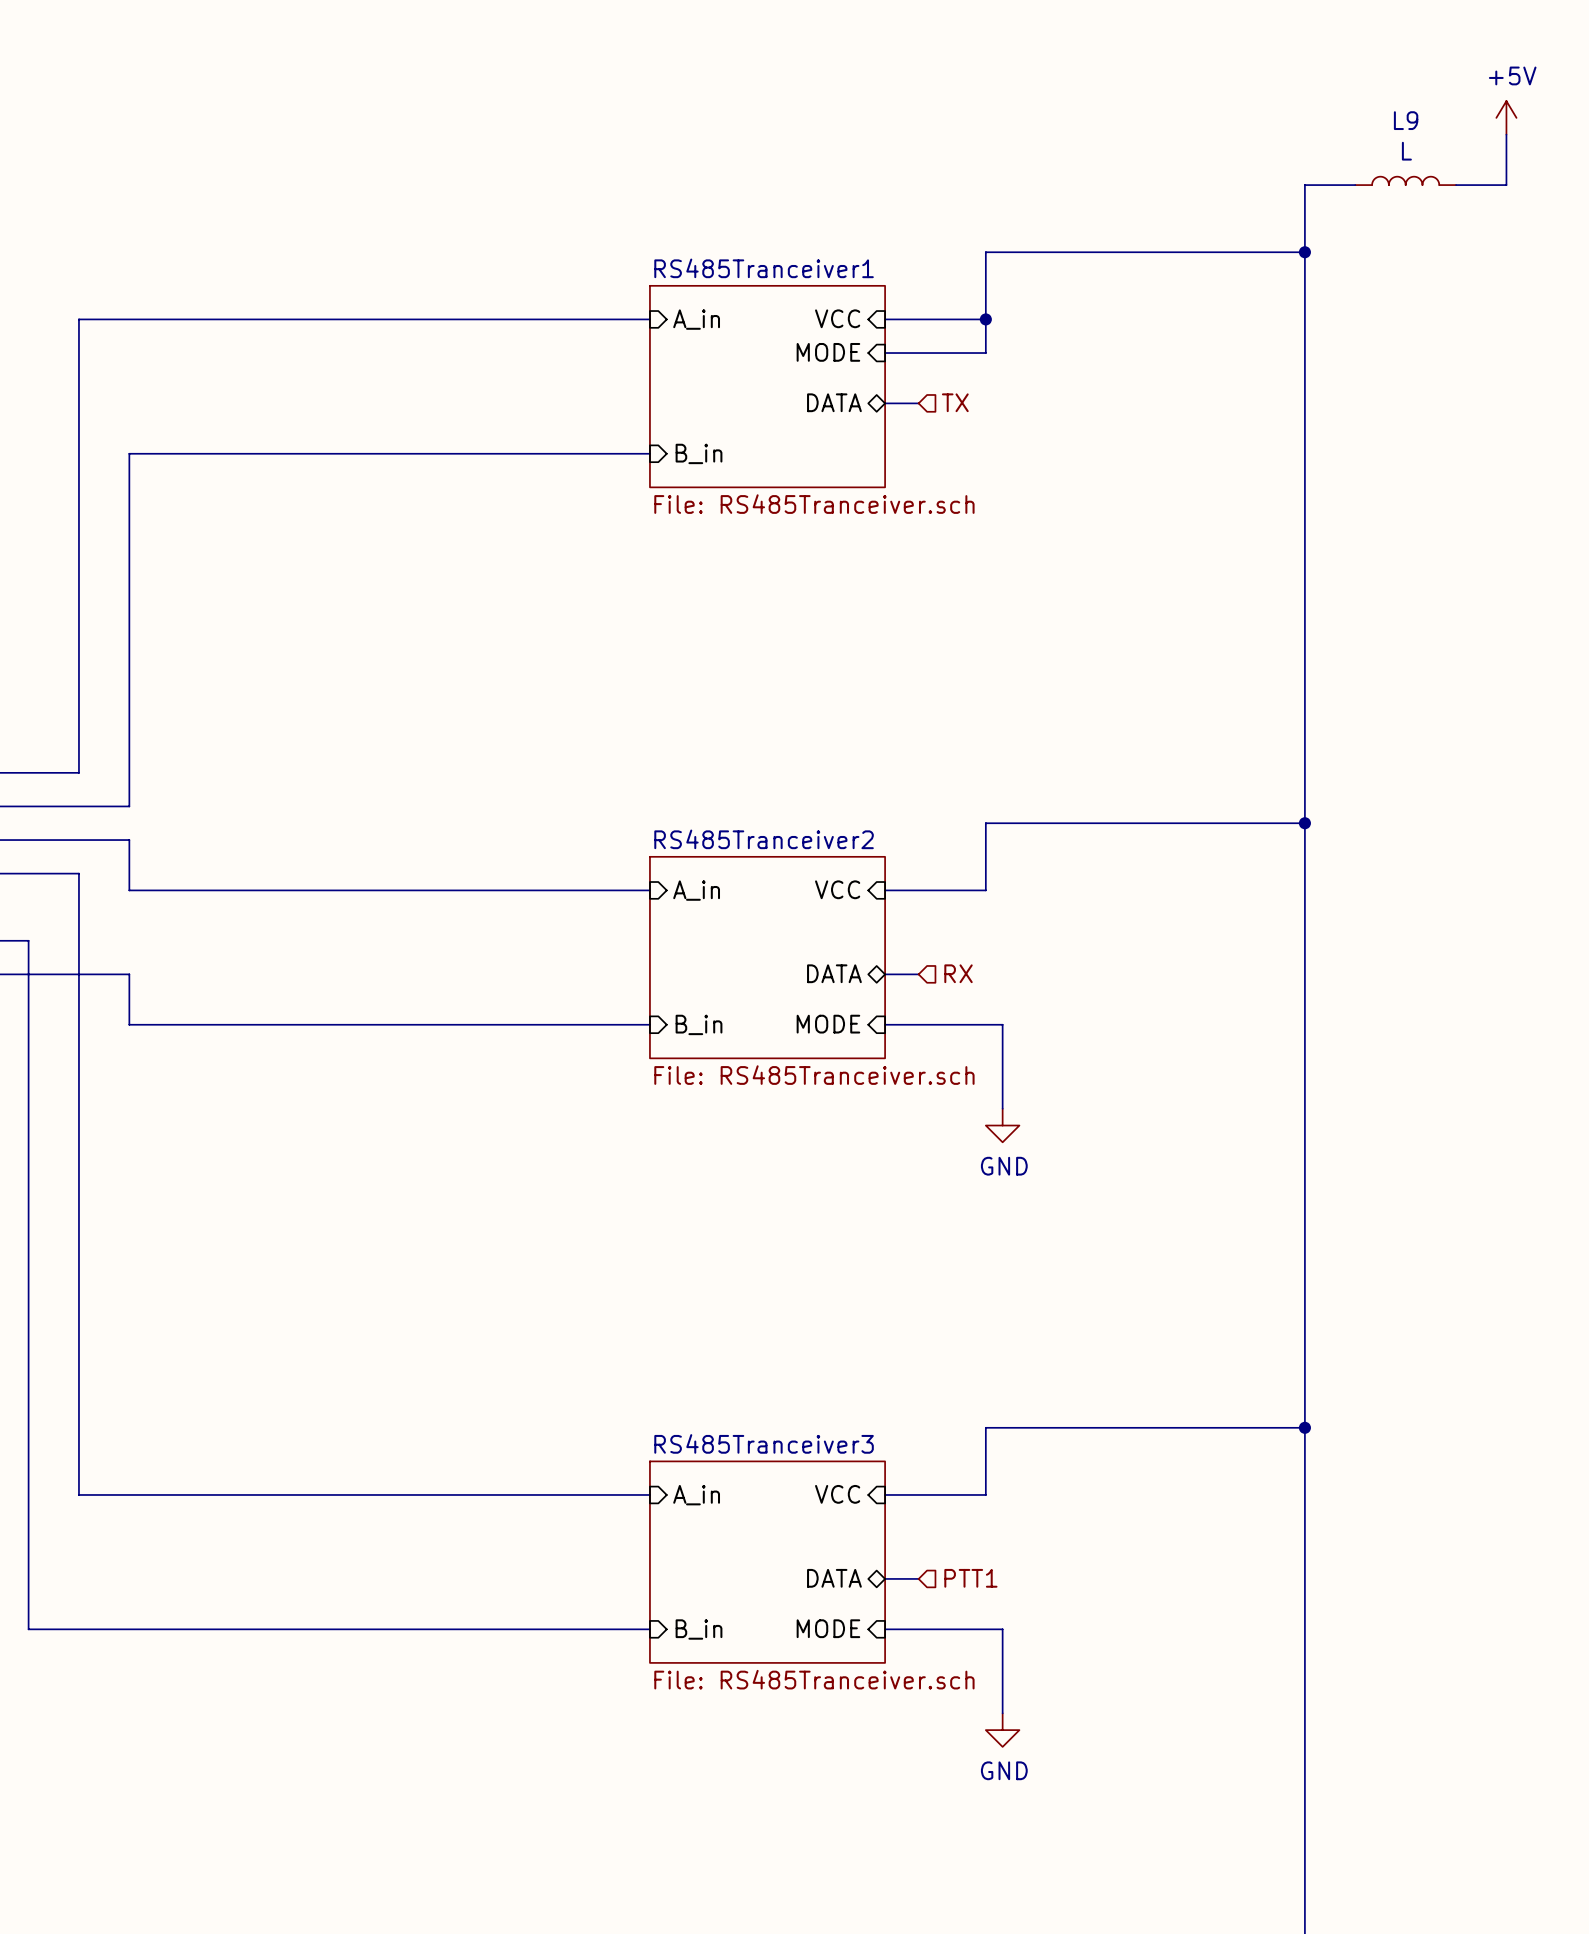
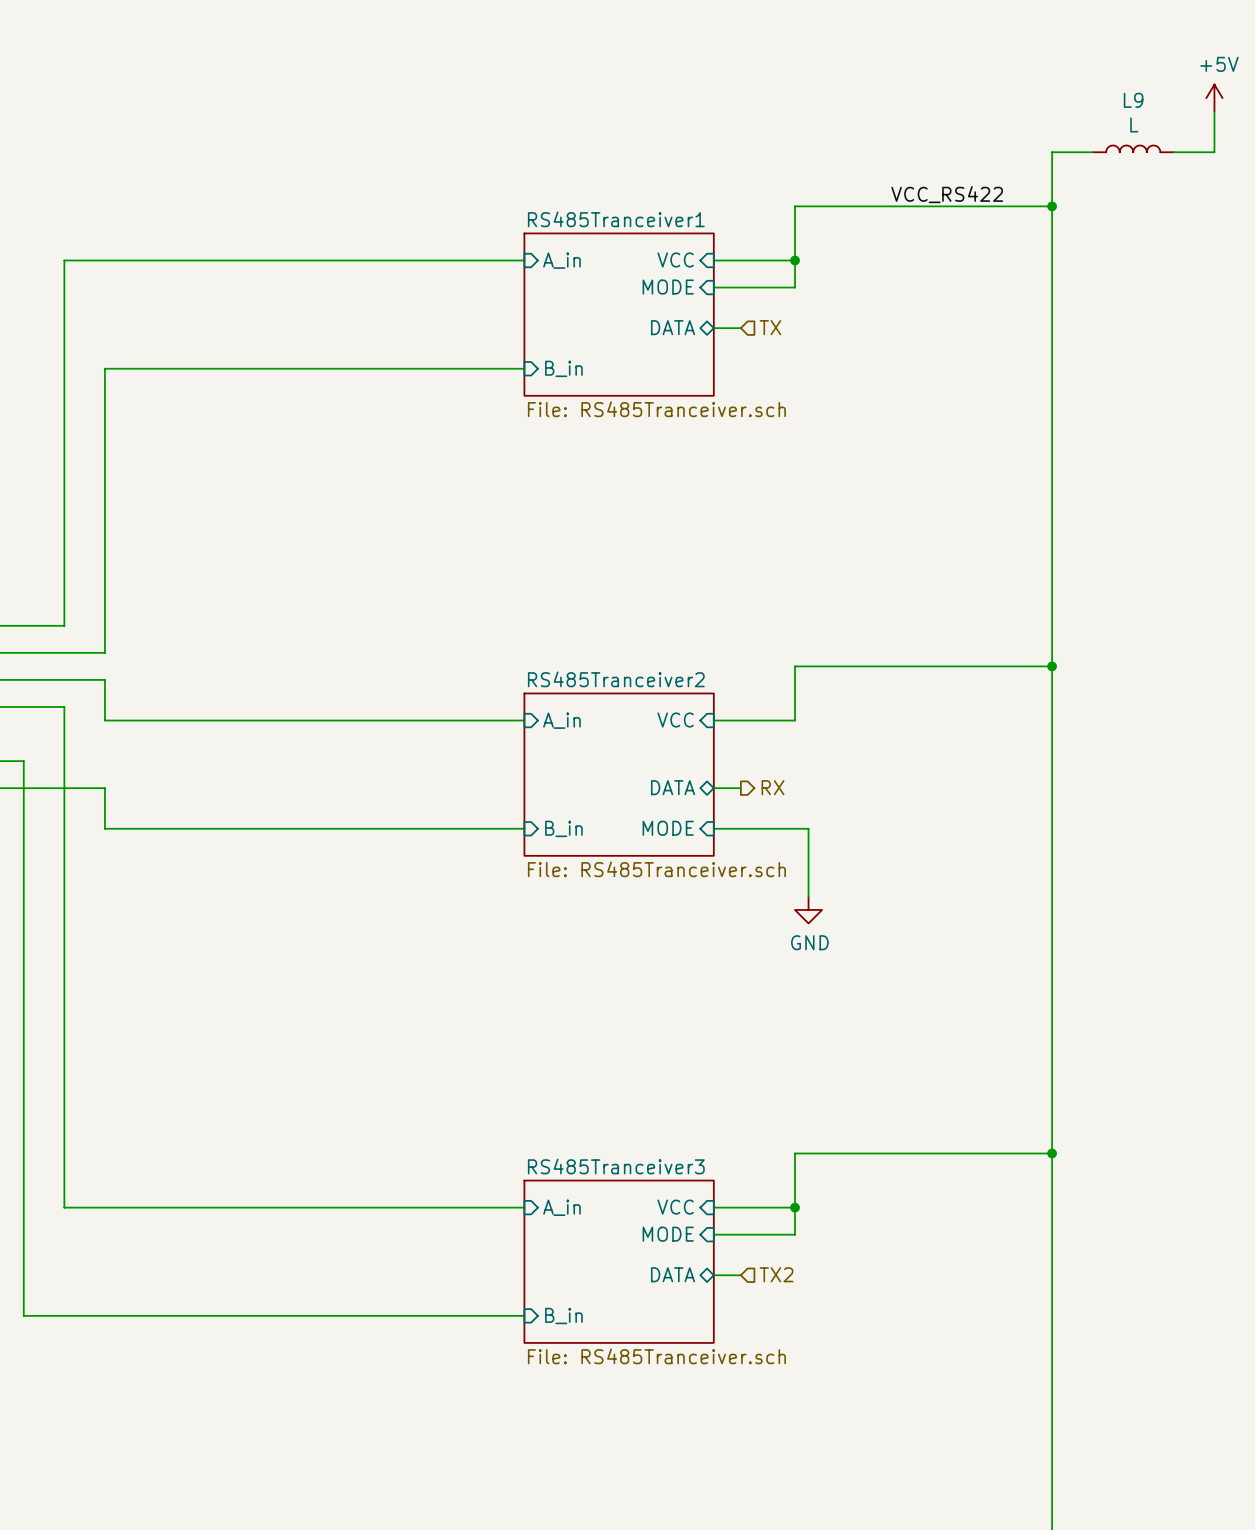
label: none -> VCC_RS422 (947, 194)
hierarchical label shape: input (958, 973) -> output (772, 787)
wire: none -> (795, 1207) (795, 1234) (713, 1234)
junction: none -> (795, 1207)
hierarchical label: PTT1 (970, 1578) -> TX2 (776, 1274)
sheet pin position: MODE (828, 1628) -> MODE (668, 1234)
wire: (885, 1629) (1002, 1629) (1002, 1713) -> none
power symbol: GND (1002, 1730) -> none

